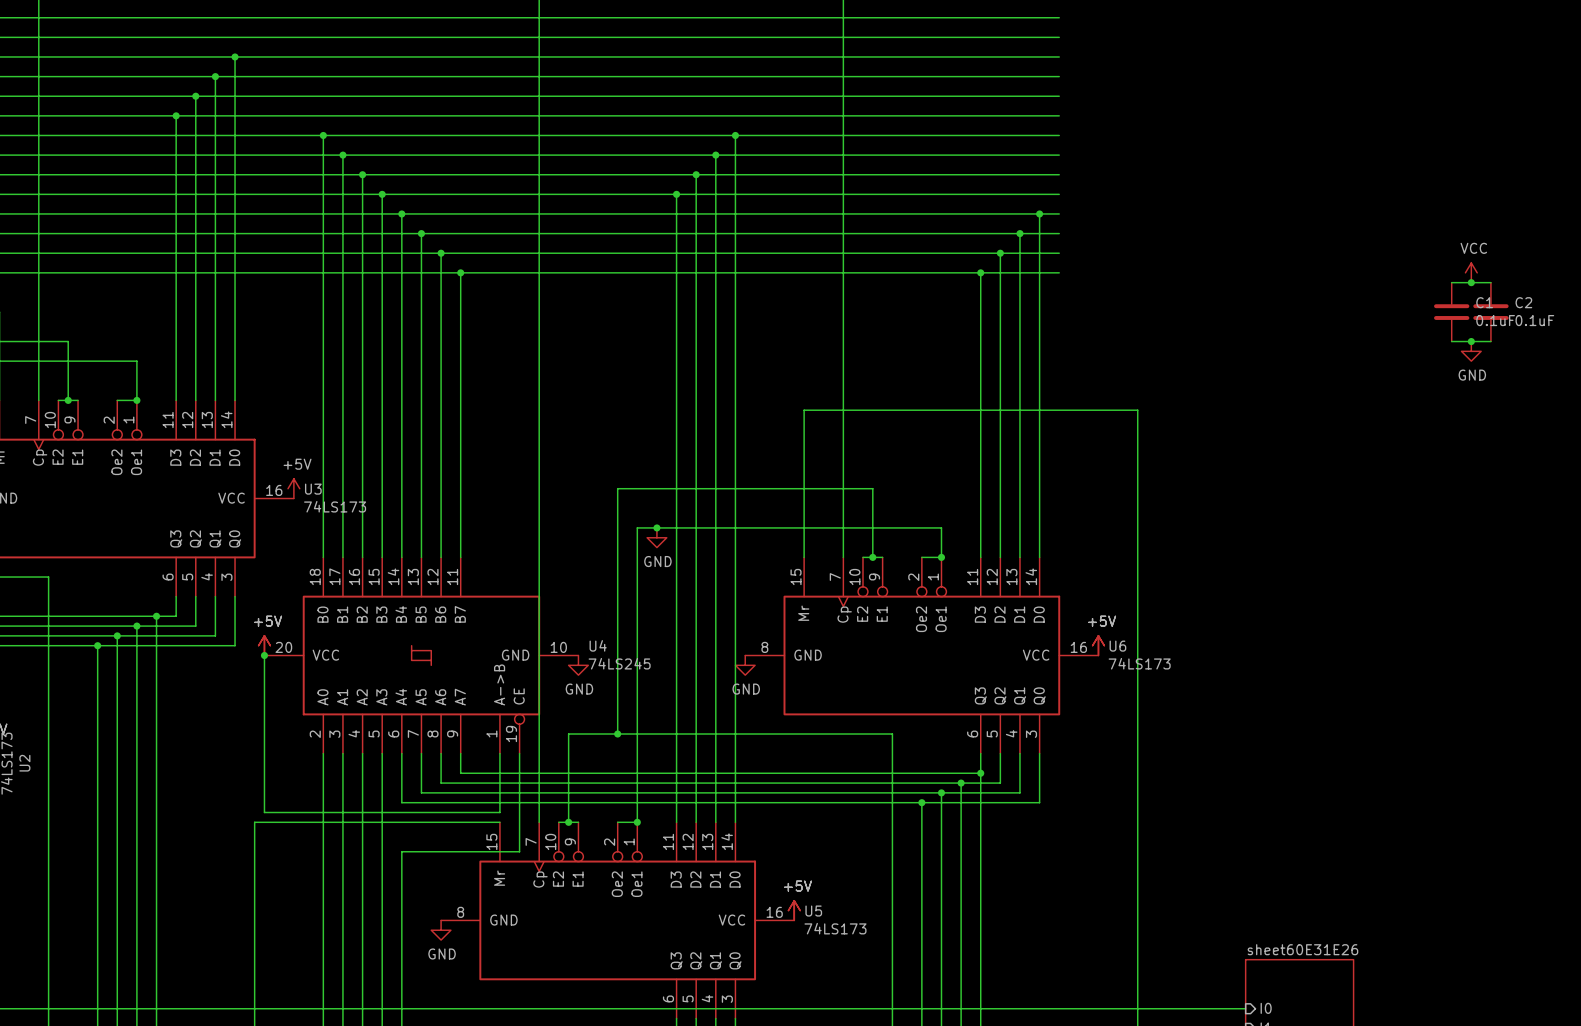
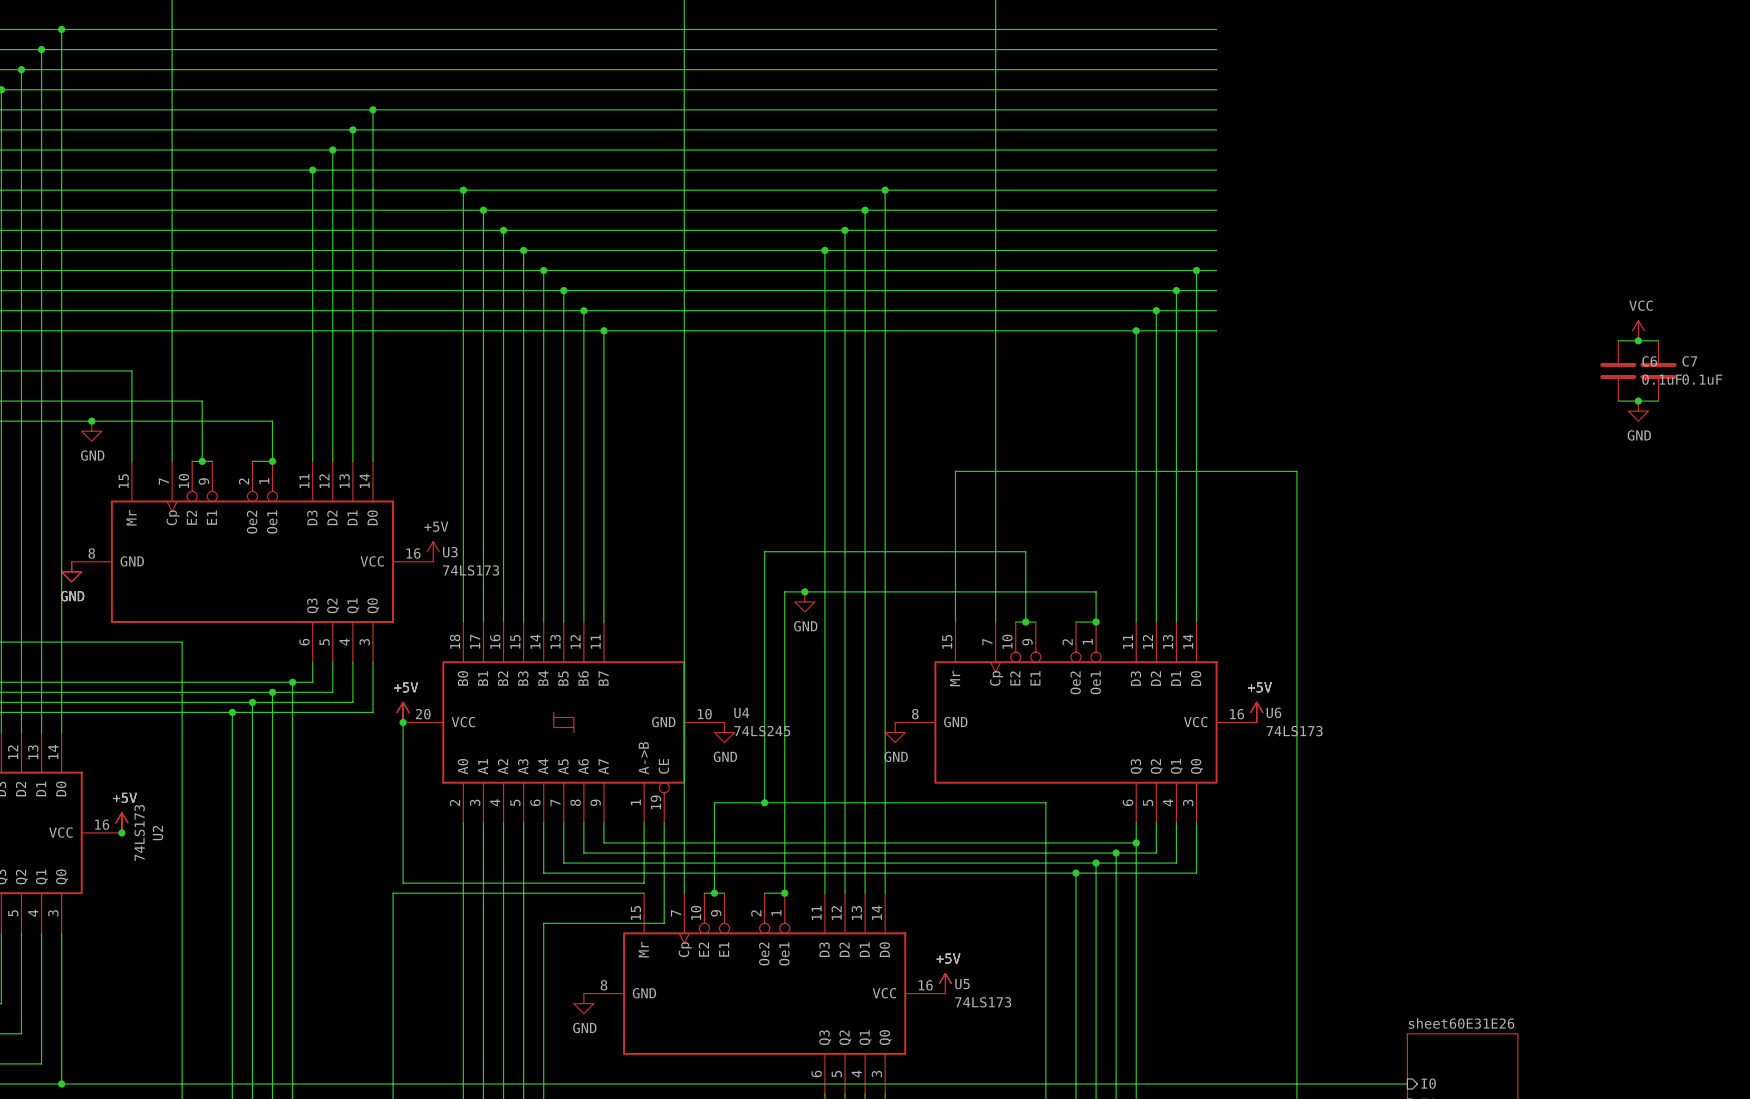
C1 name: C1 (1484, 302) -> C6 (1649, 361)
C2 name: C2 (1523, 302) -> C7 (1689, 361)

